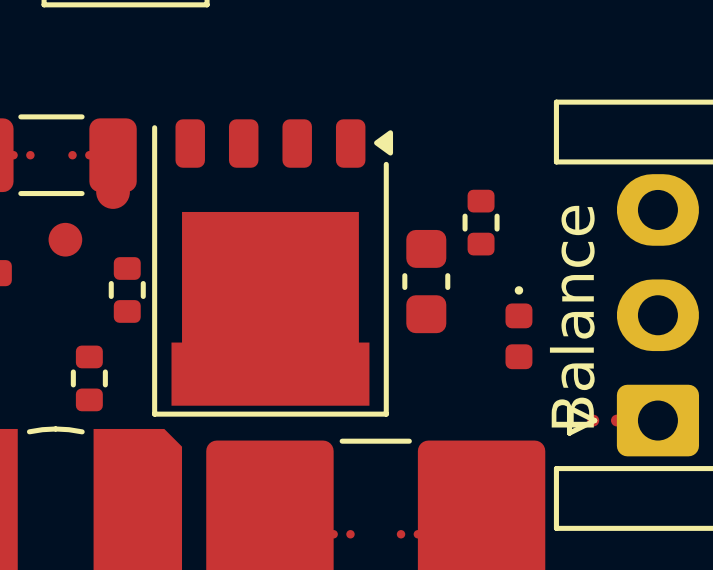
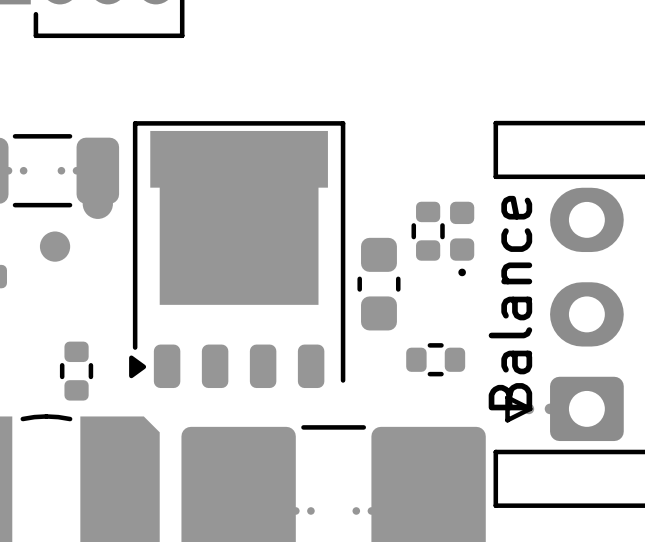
part rotation: 0° (272, 267) -> 180° (237, 254)
part rotation: 0° (127, 289) -> 90° clockwise (435, 359)
part position: (127, 289) -> (435, 359)
part rotation: 0° (518, 327) -> 180° (462, 238)
part position: (518, 327) -> (462, 238)

